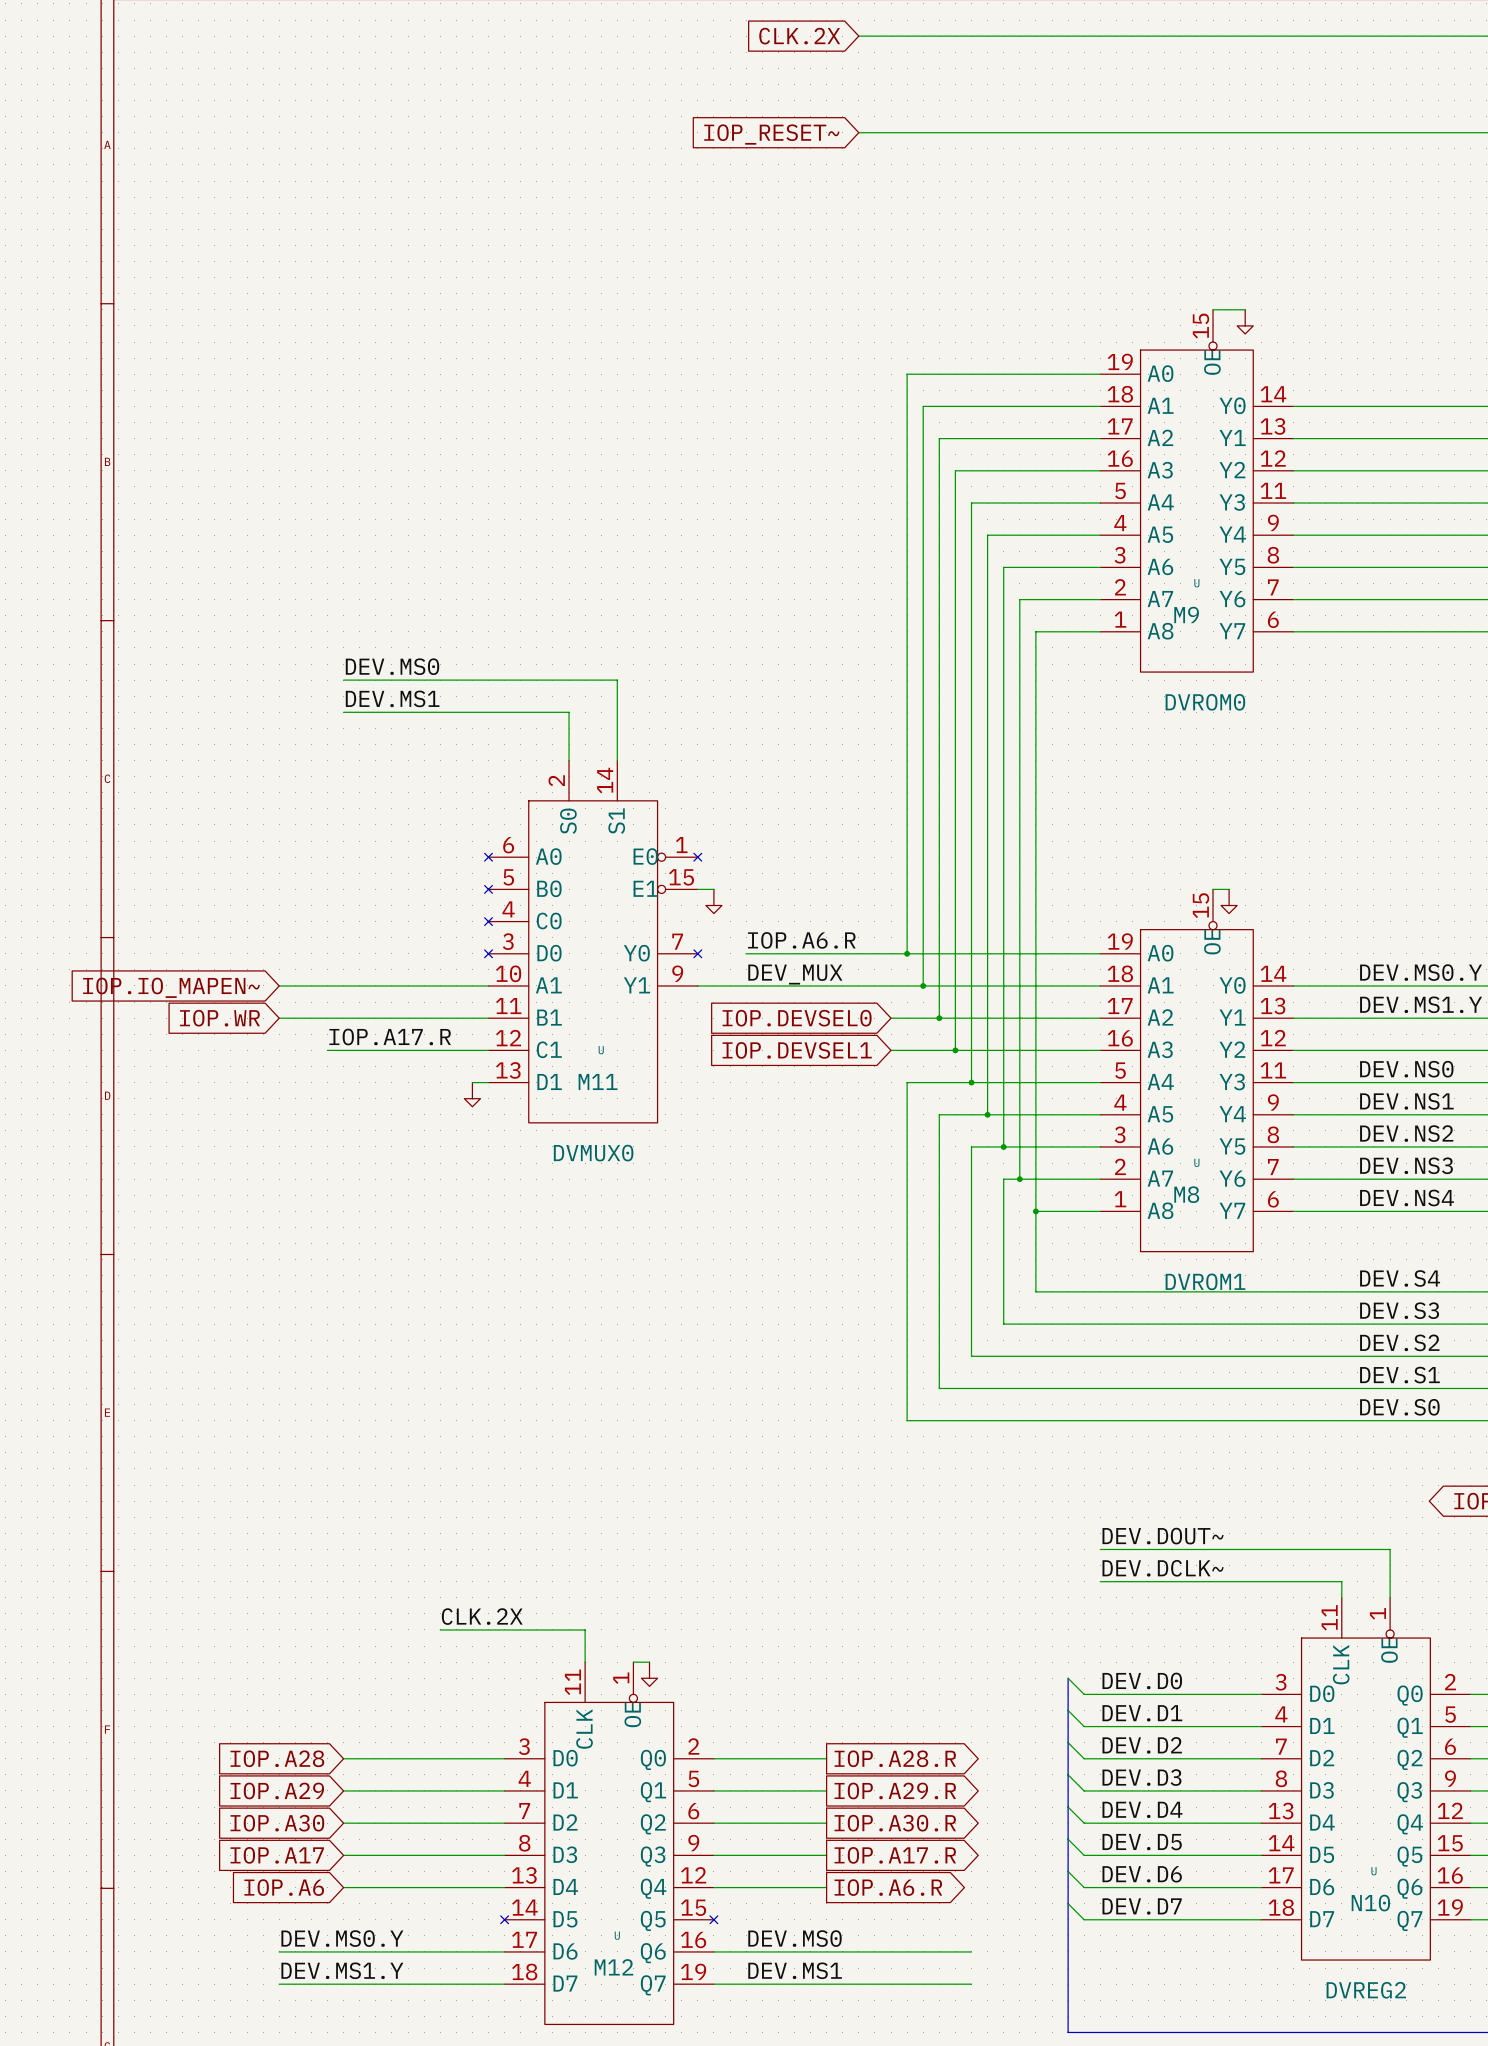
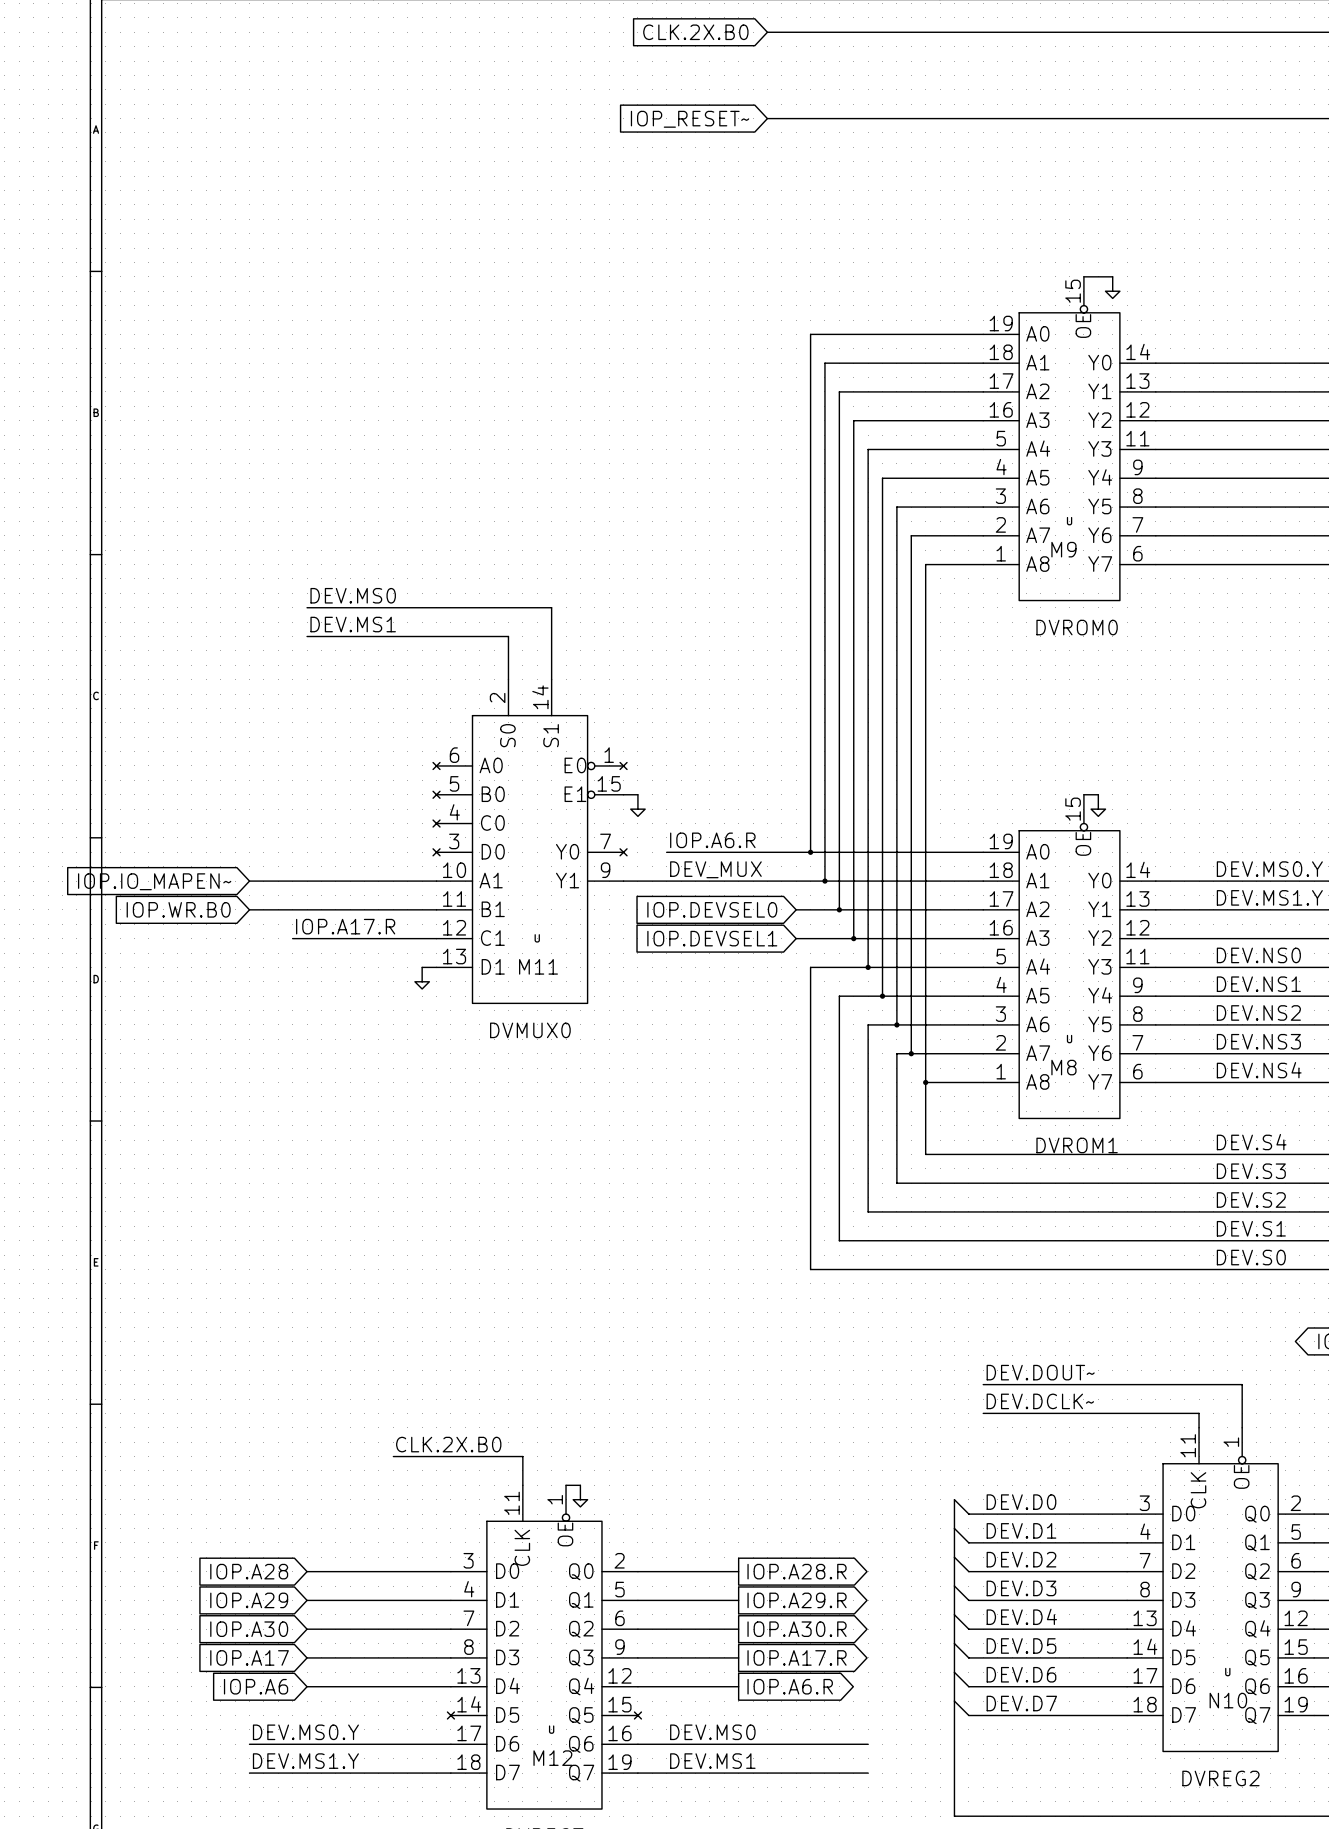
global label: CLK.2X (799, 36) -> CLK.2X.B0 (695, 32)
global label: IOP.WR (219, 1018) -> IOP.WR.B0 (178, 909)
label: CLK.2X (482, 1616) -> CLK.2X.B0 (448, 1444)

